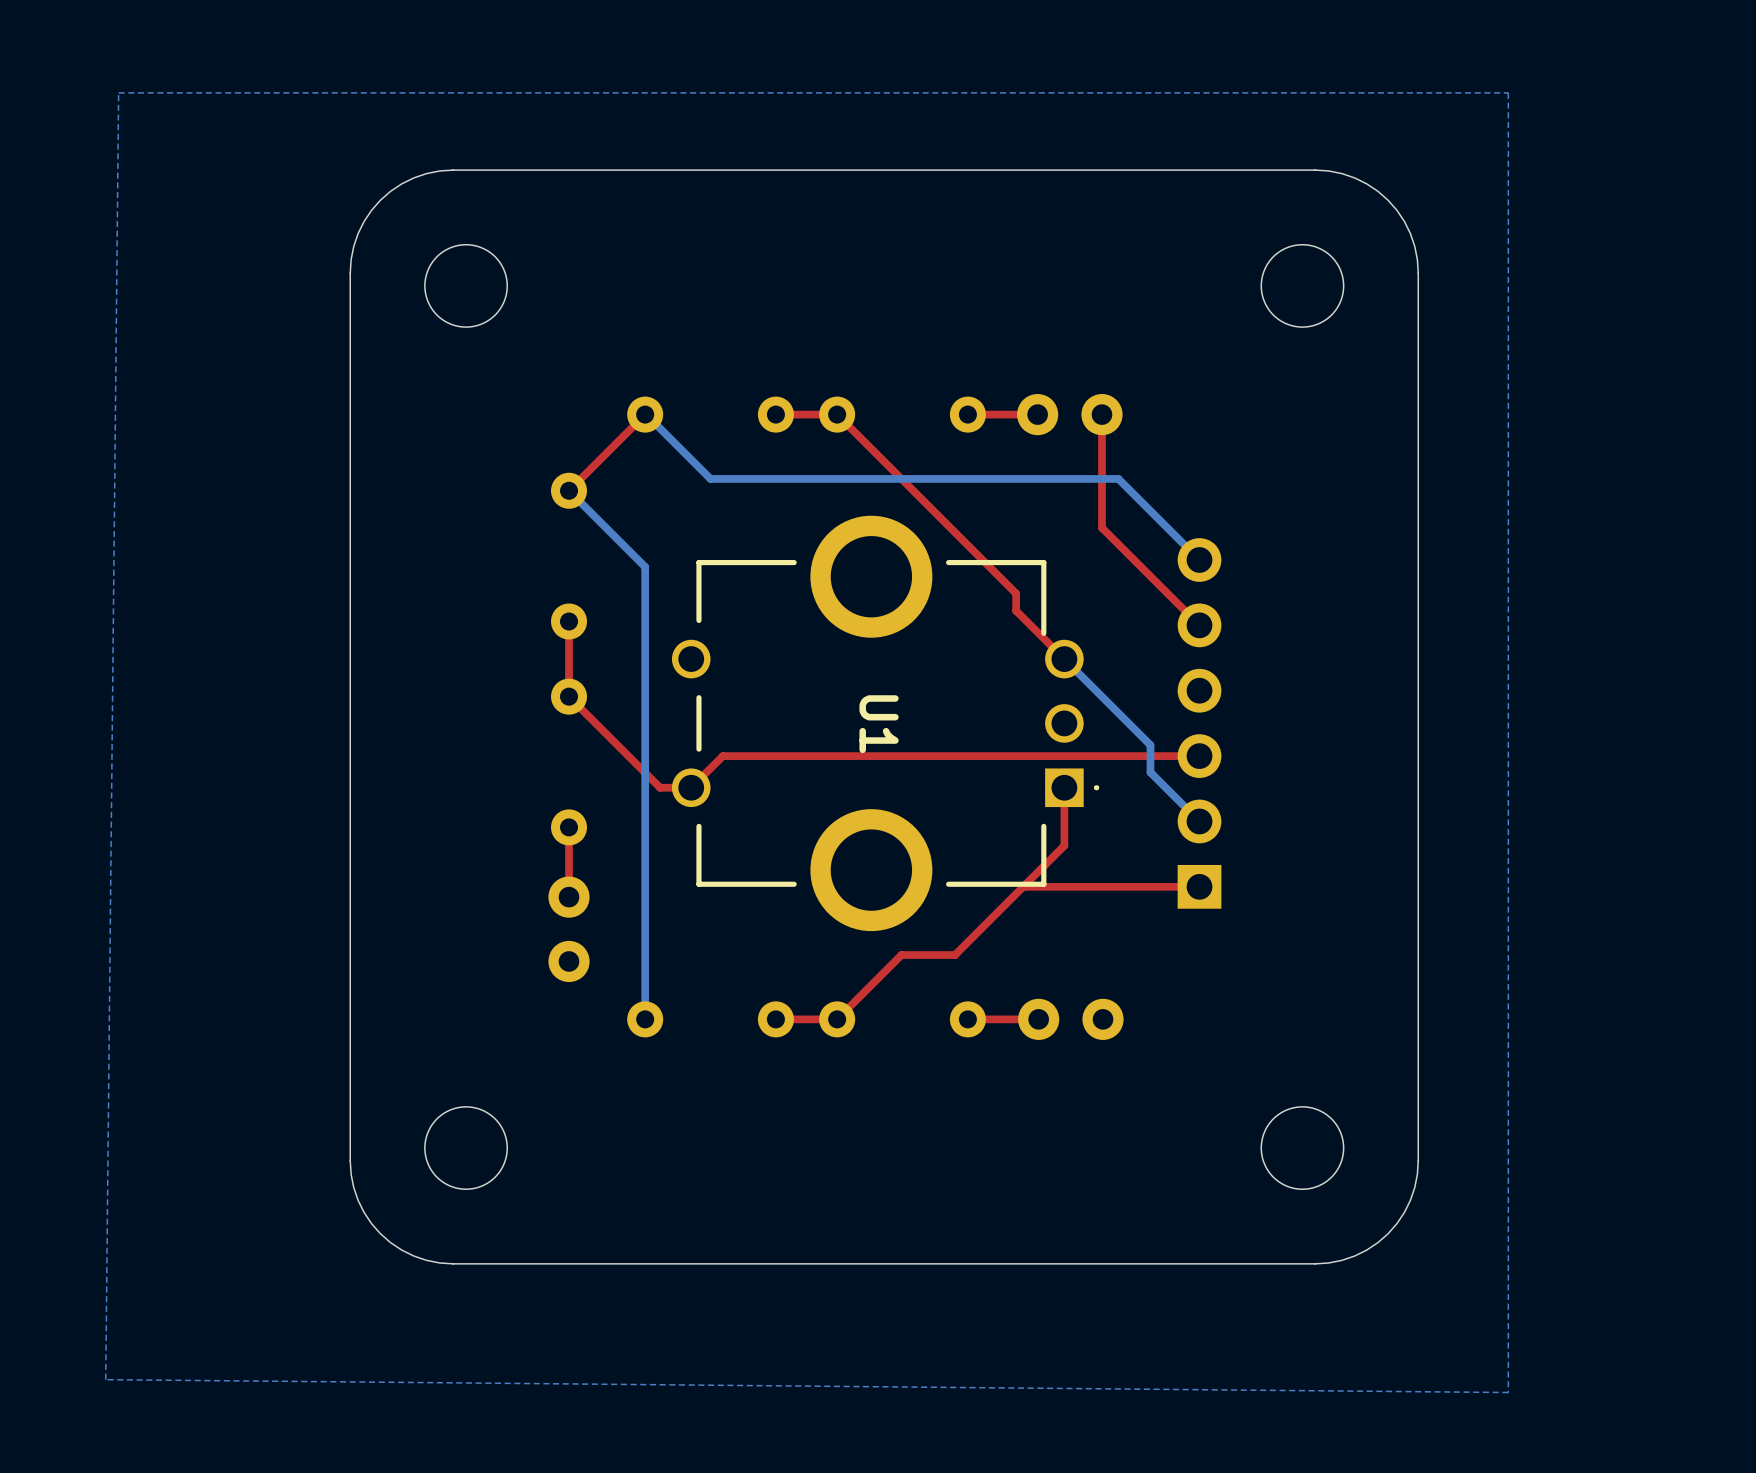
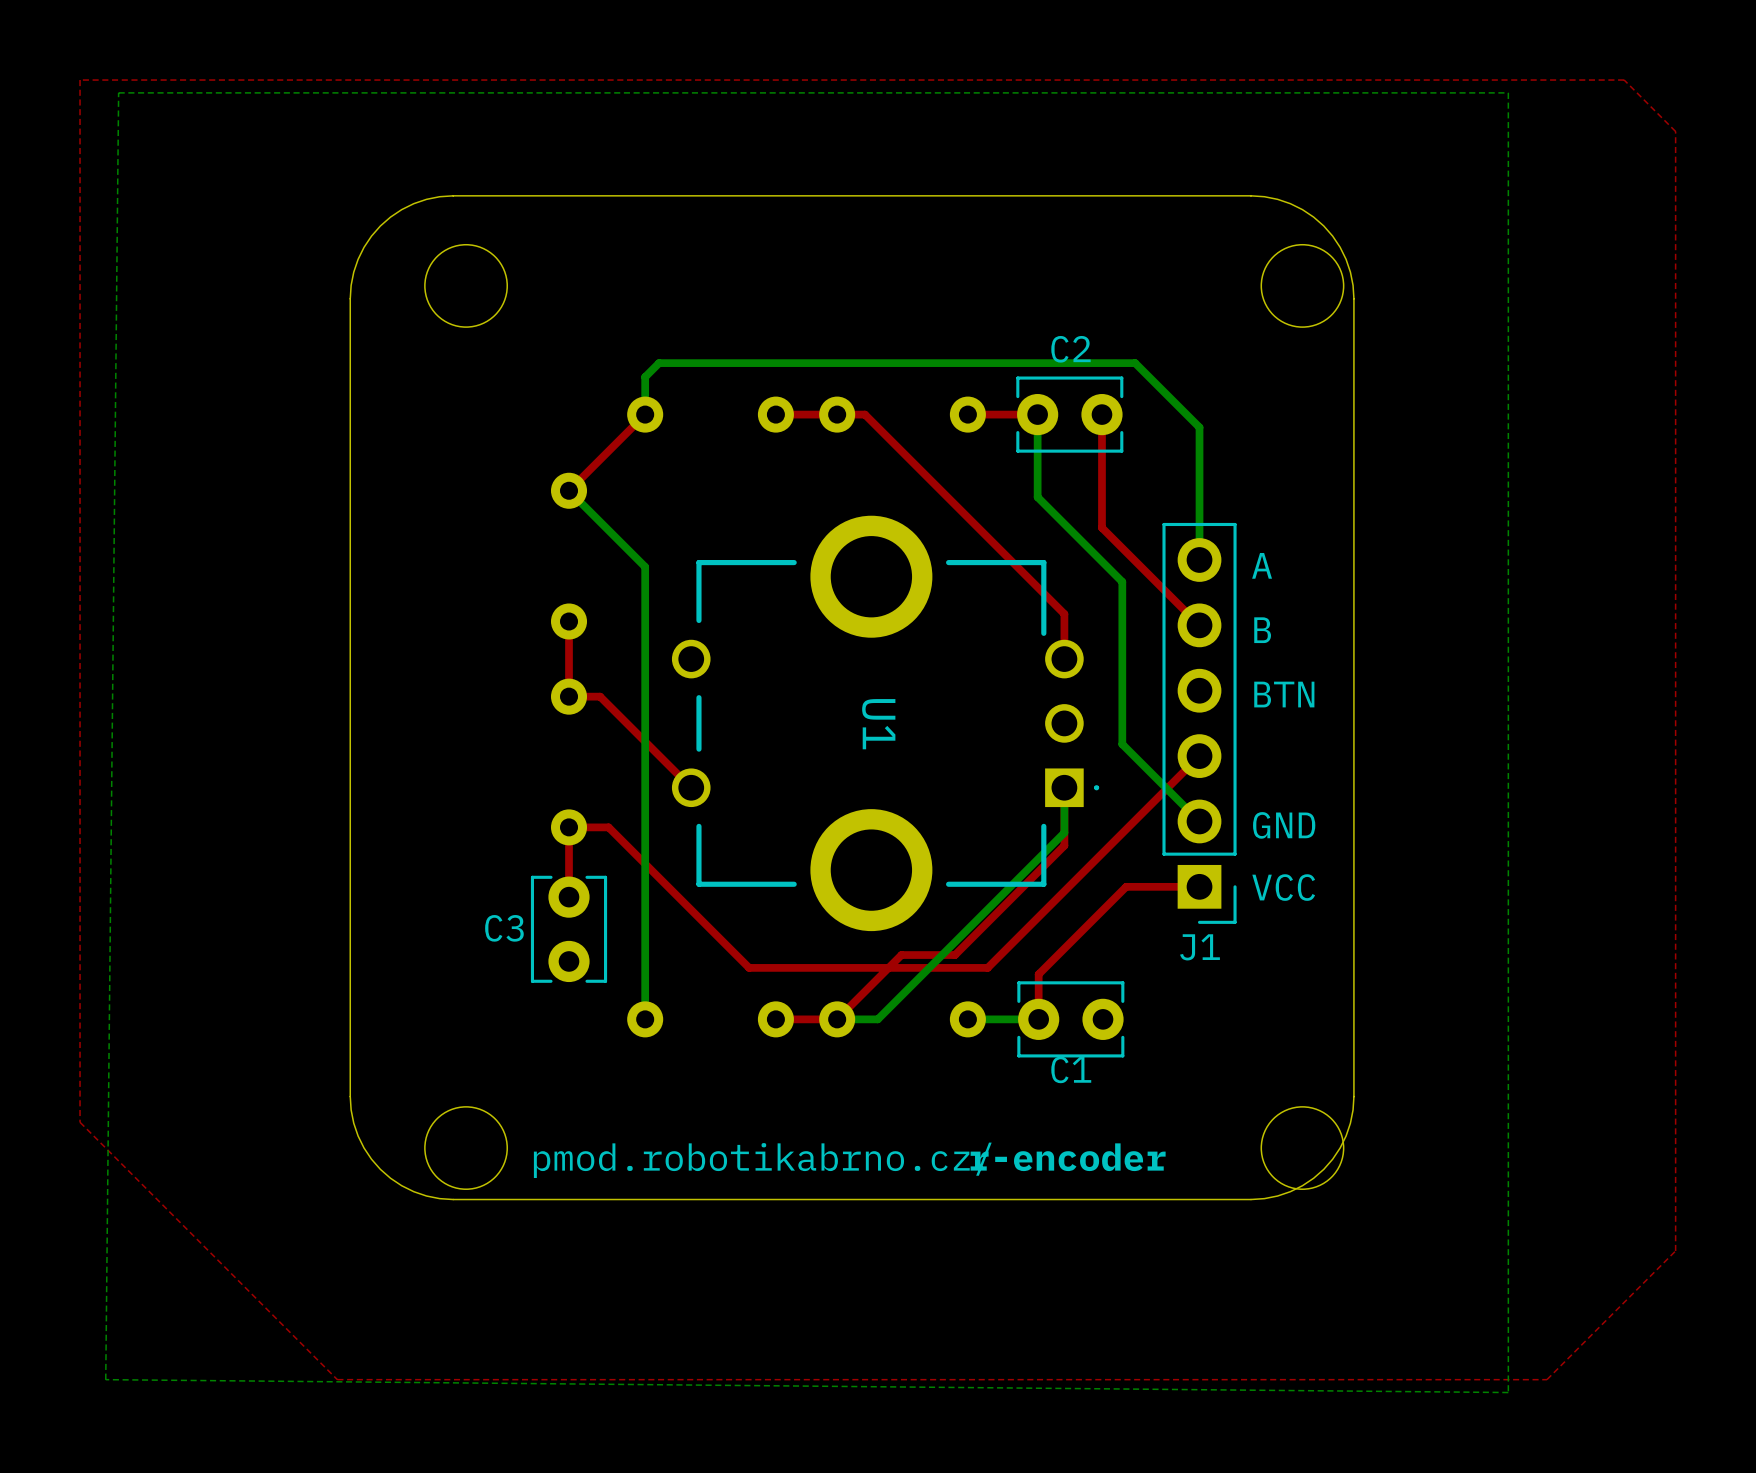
top zone outline: none -> (1624, 80) (1675, 131) (1675, 1250) (1546, 1379) (337, 1379) (80, 1122) (80, 80) (1624, 80)
board edge: (350, 298) (351, 259) (353, 246) (358, 233) (371, 210) (380, 200) (401, 183) (426, 173) (439, 170) (1315, 170) (1341, 173) (1366, 183) (1377, 191) (1397, 210) (1410, 233) (1417, 259) (1418, 273) (1417, 1174) (1410, 1200) (1397, 1223) (1388, 1233) (1366, 1250) (1354, 1256) (1328, 1262) (439, 1262) (426, 1260) (401, 1250) (380, 1233) (364, 1212) (358, 1200) (351, 1174) (350, 1096) -> (350, 298) (351, 285) (358, 259) (364, 247) (380, 225) (401, 209) (413, 203) (426, 199) (453, 195) (1264, 196) (1277, 199) (1302, 209) (1313, 217) (1332, 236) (1340, 247) (1350, 272) (1353, 298) (1353, 1096) (1350, 1123) (1340, 1148) (1332, 1159) (1313, 1178) (1302, 1185) (1277, 1196) (1250, 1199) (439, 1198) (426, 1196) (401, 1185) (390, 1178) (371, 1159) (364, 1148) (353, 1123) (350, 1096)
bottom track: (646, 414) (710, 478) (1118, 478) (1199, 559) -> (645, 414) (645, 377) (659, 363) (1135, 363) (1199, 427) (1199, 559)
top track: (837, 414) (1016, 593) (1016, 610) (1064, 659) -> (837, 414) (864, 414) (1064, 614) (1064, 659)
C2 side: top (1069, 414) -> bottom (1069, 414)
text: none -> A (1262, 565)
text: none -> B (1262, 630)
bottom track: (1064, 659) (1150, 745) (1150, 772) -> (1037, 414) (1037, 497) (1122, 581) (1122, 744) (1150, 772)
text: none -> BTN (1284, 694)
top track: (569, 696) (660, 787) (691, 787) (722, 756) (1199, 756) -> (569, 827) (608, 827) (749, 967) (987, 967) (1199, 756)
top track: none -> (569, 696) (600, 696) (691, 787)
J1 side: top (1199, 723) -> bottom (1199, 723)
bottom track: none -> (1064, 787) (1064, 832) (877, 1019) (837, 1019)
text: none -> GND (1284, 825)
top track: (1126, 886) (1023, 886) -> (1126, 886) (1038, 974) (1038, 1019)
text: none -> VCC (1283, 887)
C3 side: top (569, 929) -> bottom (569, 929)
top track: (1038, 1019) (967, 1019) -> none
bottom track: none -> (1038, 1019) (967, 1019)
C1 side: top (1070, 1019) -> bottom (1070, 1019)
text: none -> r-encoder (1068, 1157)
text: none -> pmod.robotikabrno.cz/ (762, 1160)

